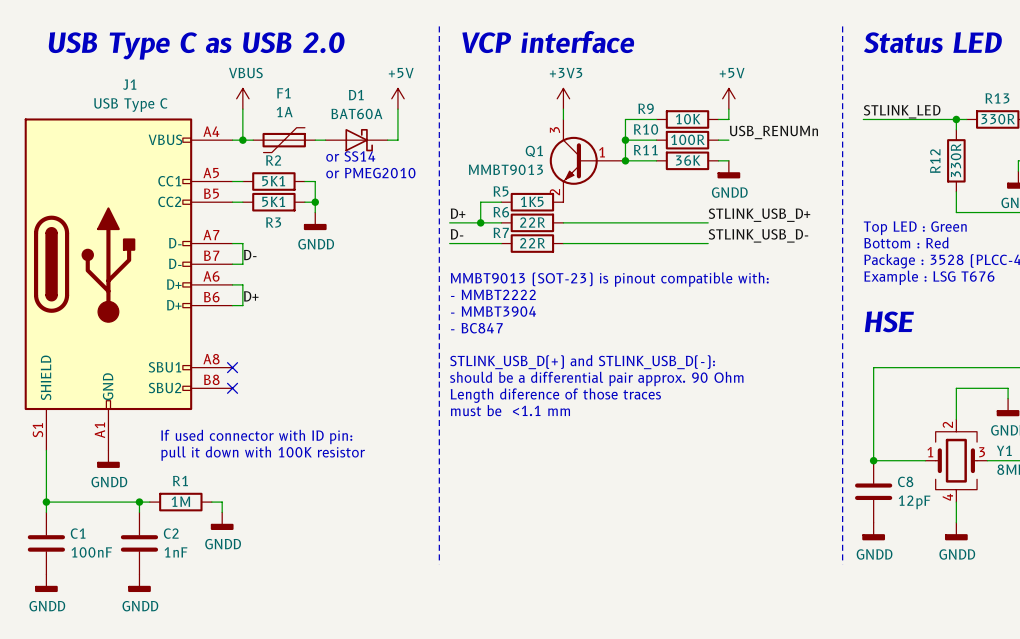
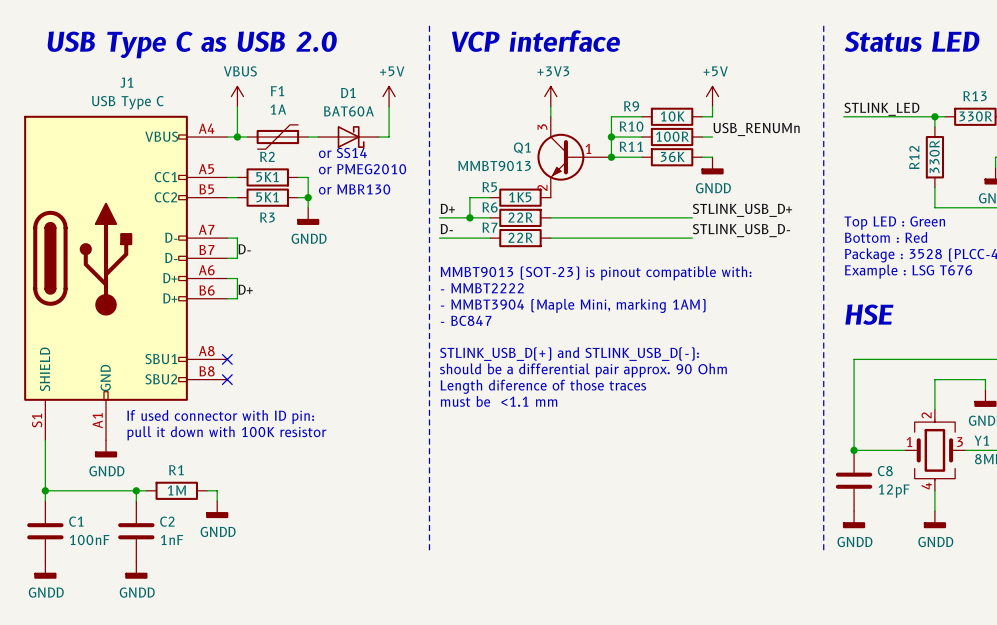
text: none -> or MBR130 (354, 189)
text: - MMBT3904 (493, 311) -> - MMBT3904 (Maple Mini, marking 1AM) (573, 305)
text position: If used connector with ID pin: (256, 436) -> If used connector with ID pin: (220, 417)
text position: pull it down with 100K resistor (263, 453) -> pull it down with 100K resistor (226, 433)

